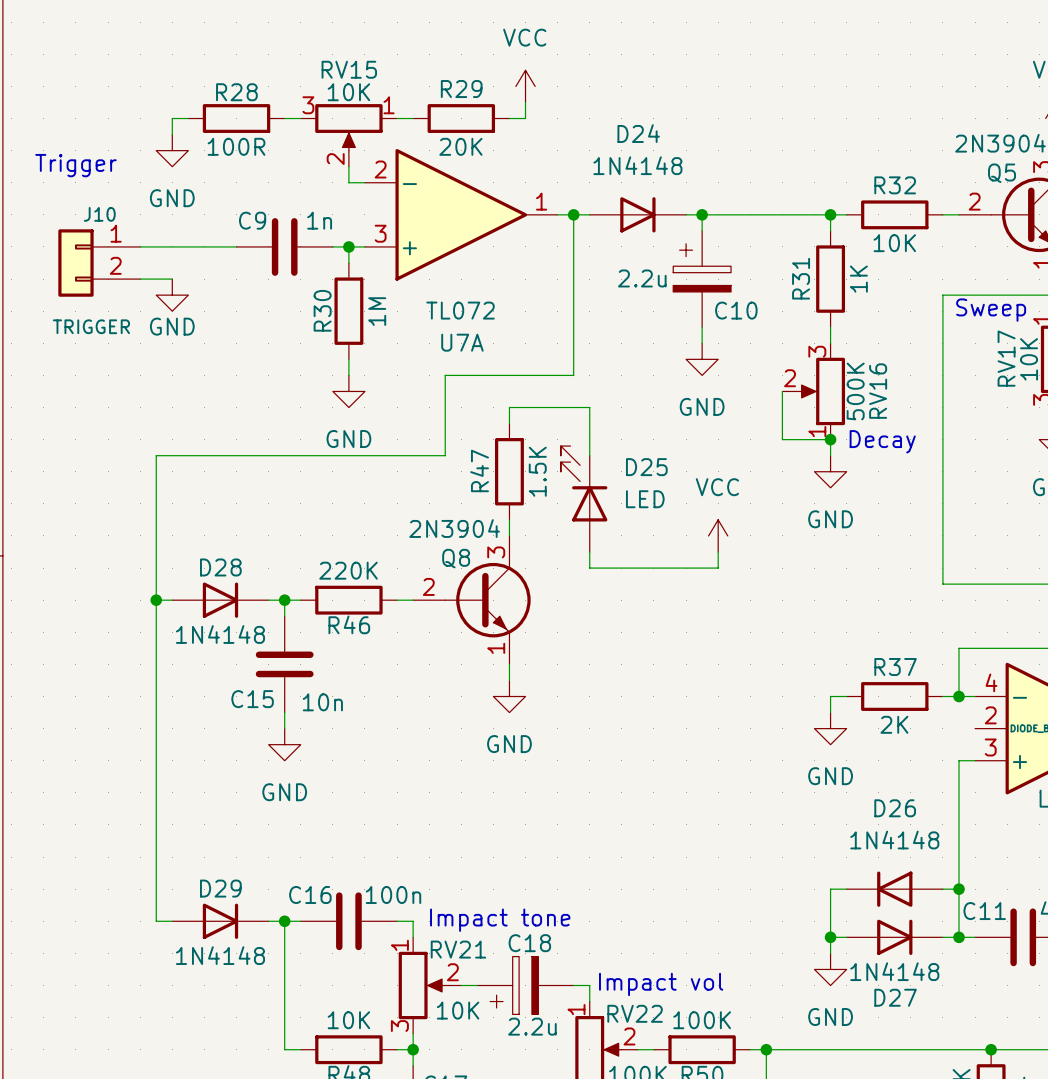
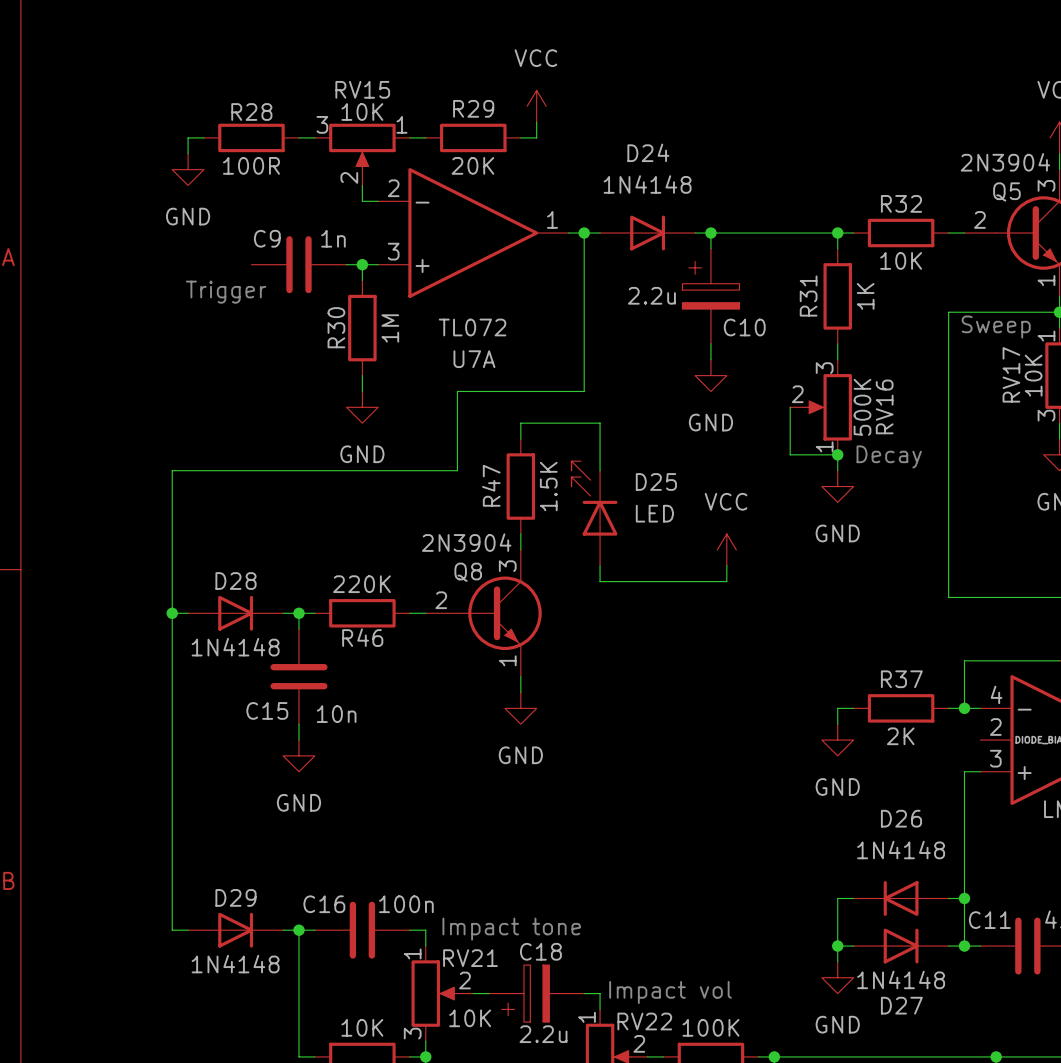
text position: Trigger (75, 165) -> Trigger (226, 292)
wire: (140, 246) (236, 246) -> none
J10: TRIGGER (99, 263) -> none
wire: (140, 279) (172, 279) -> none
power symbol: GND (172, 295) -> none

